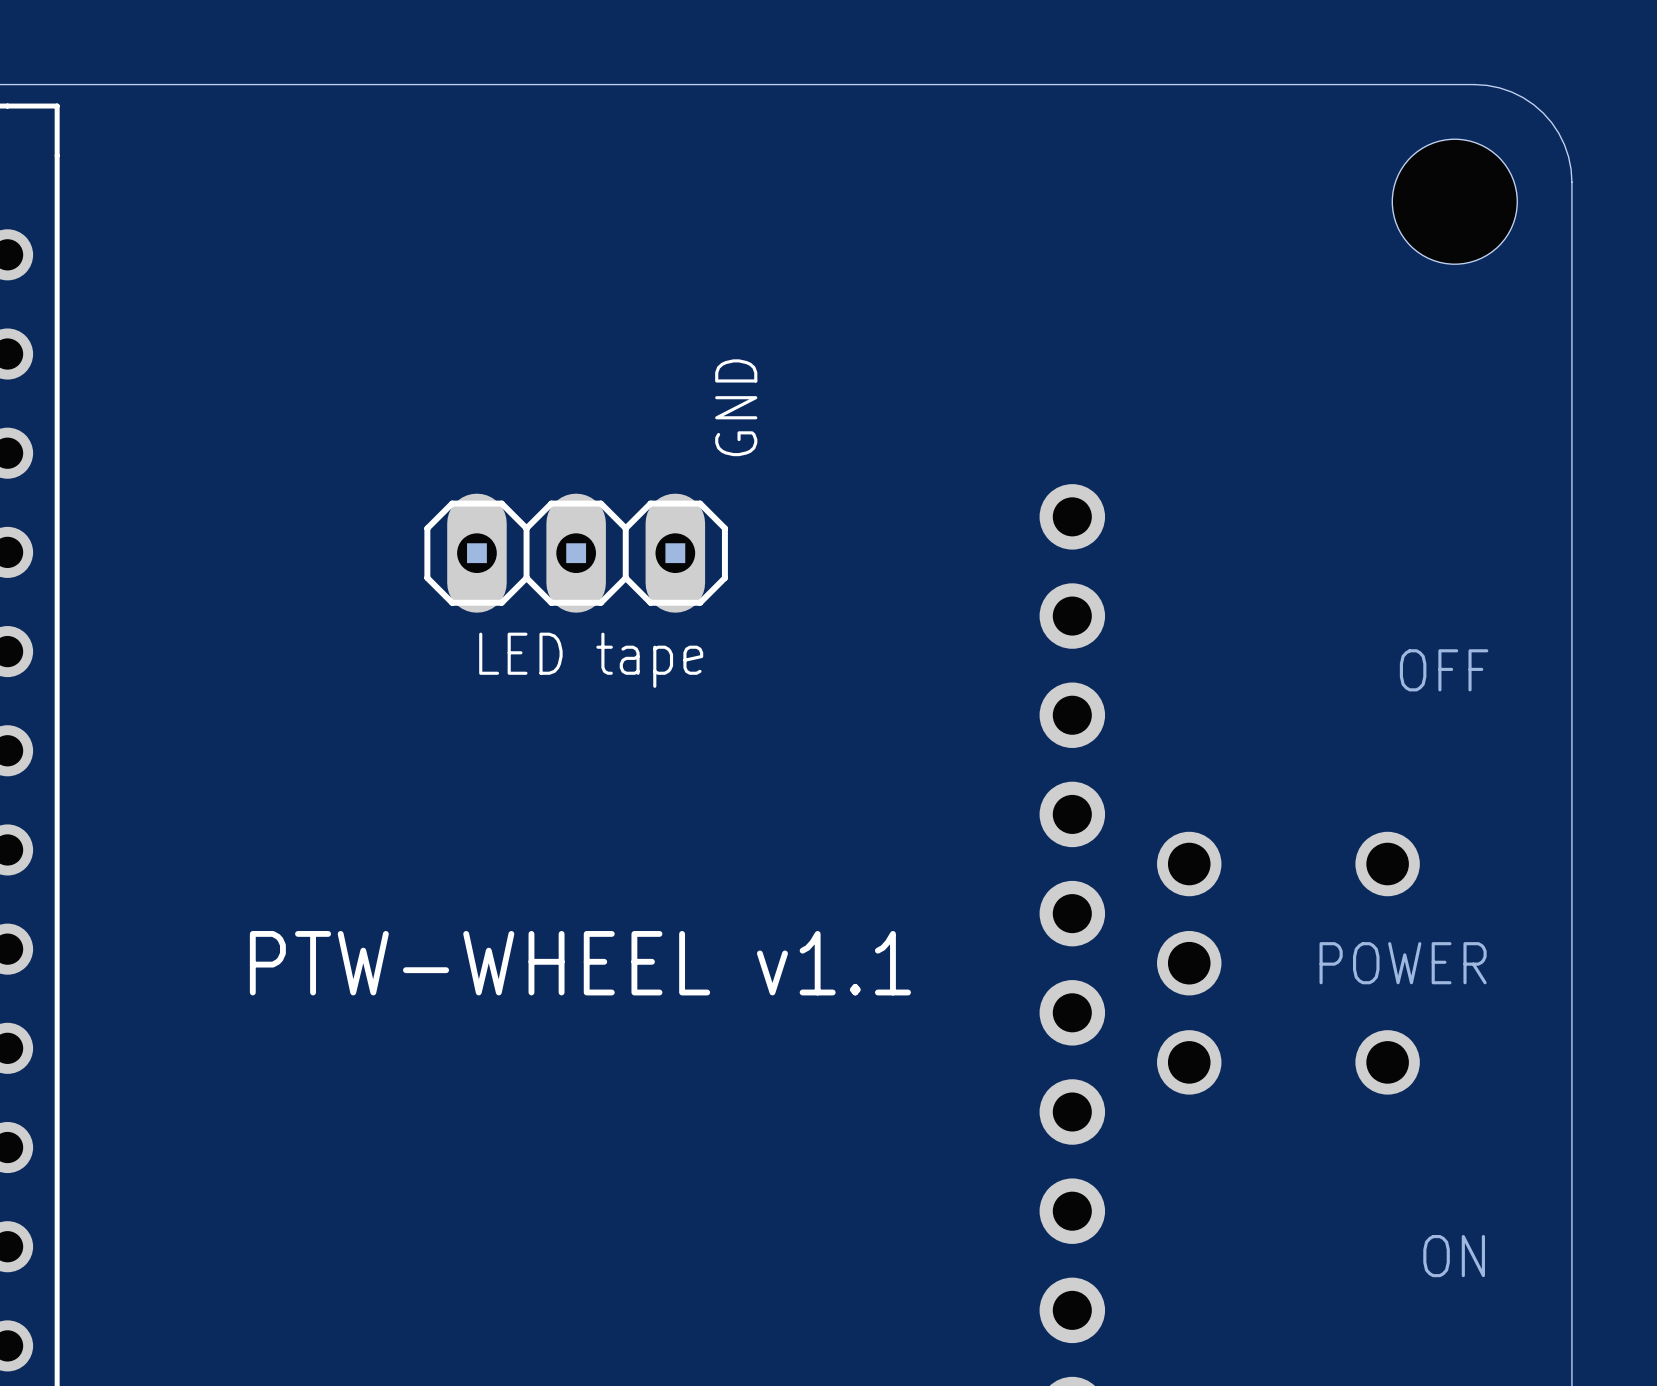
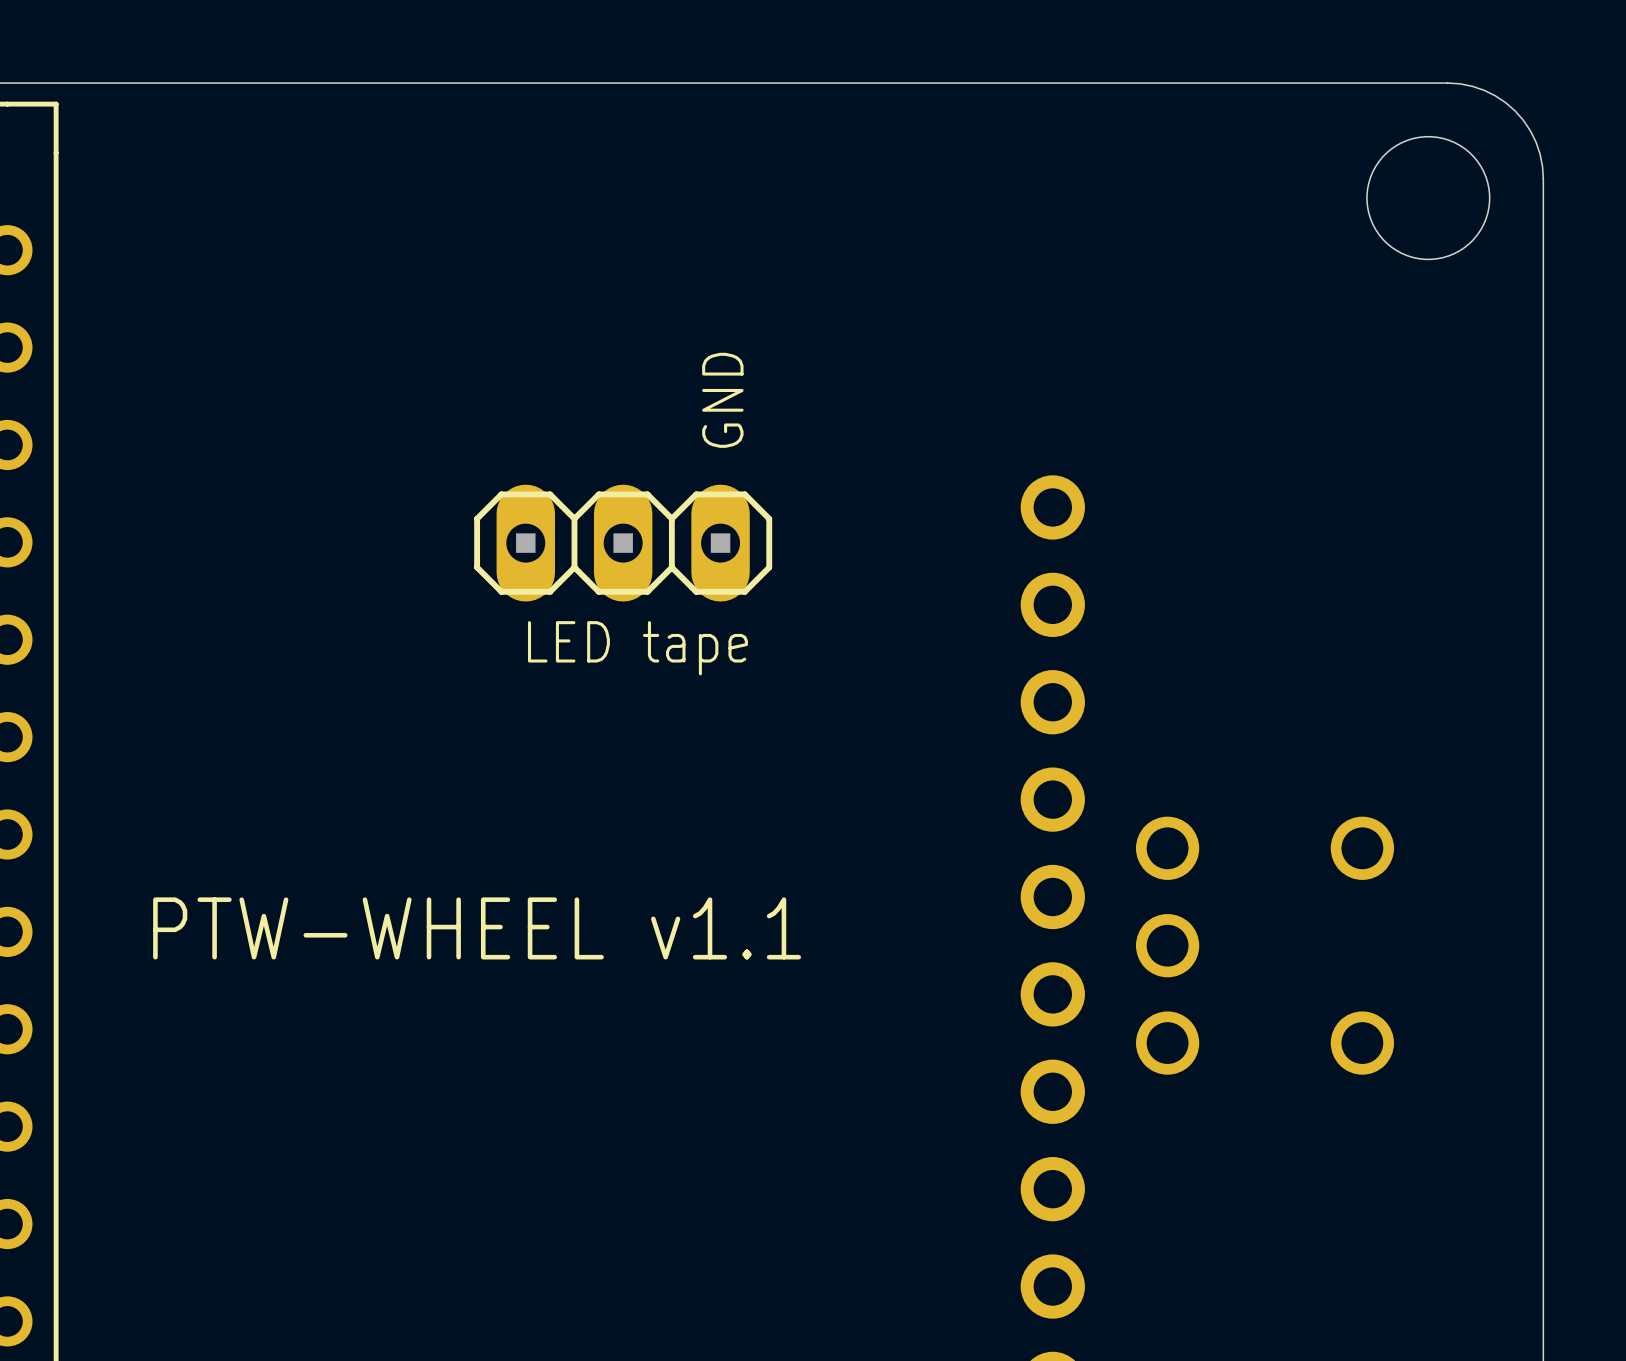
part position: (576, 553) -> (623, 543)
text: OFF (1444, 670) -> none
text position: PTW-WHEEL v1.1 (580, 963) -> PTW-WHEEL v1.1 (477, 928)
text: POWER (1403, 963) -> none
text: ON (1454, 1256) -> none

